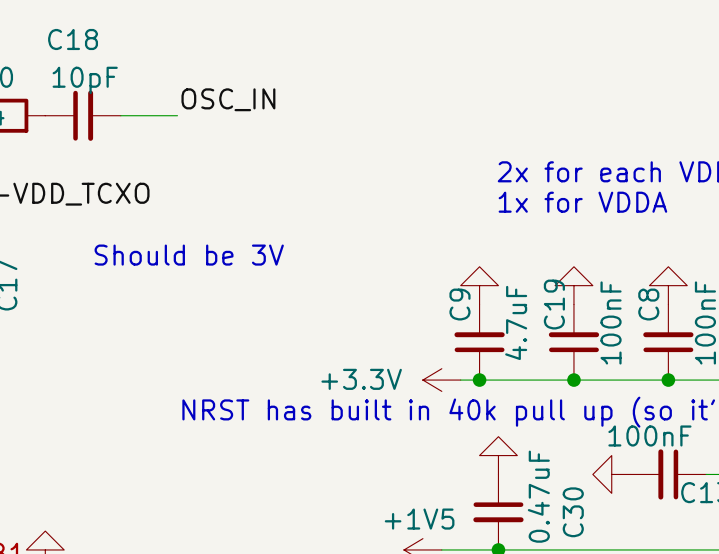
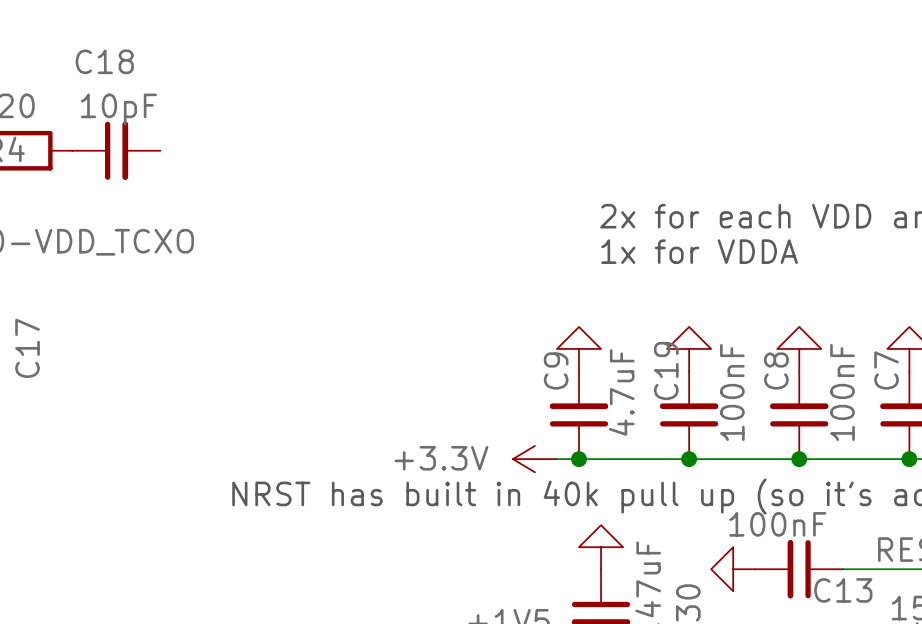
label: OSC_IN (228, 99) -> none
wire: (120, 115) (177, 115) -> none
text: Should be 3V (189, 255) -> none

